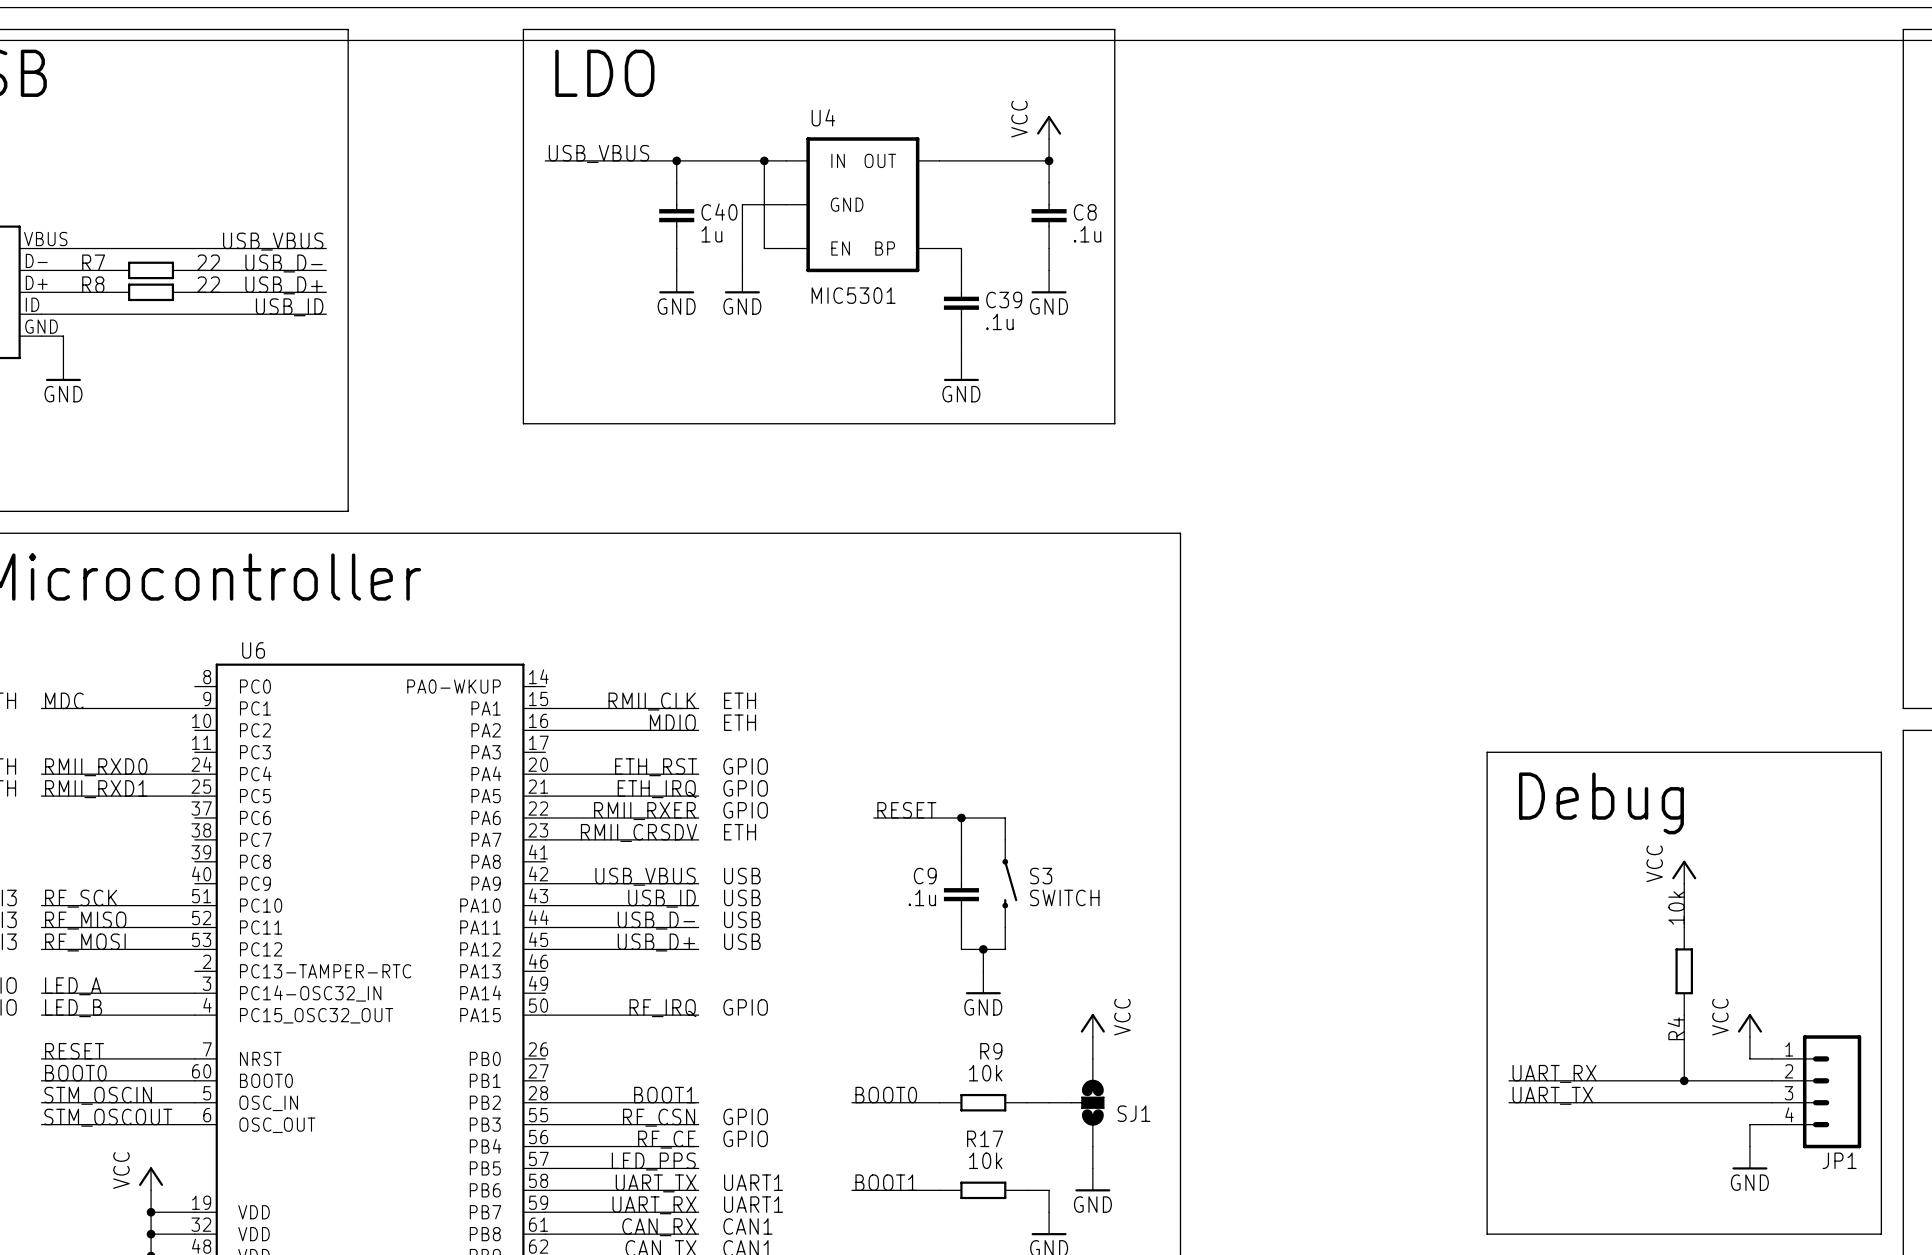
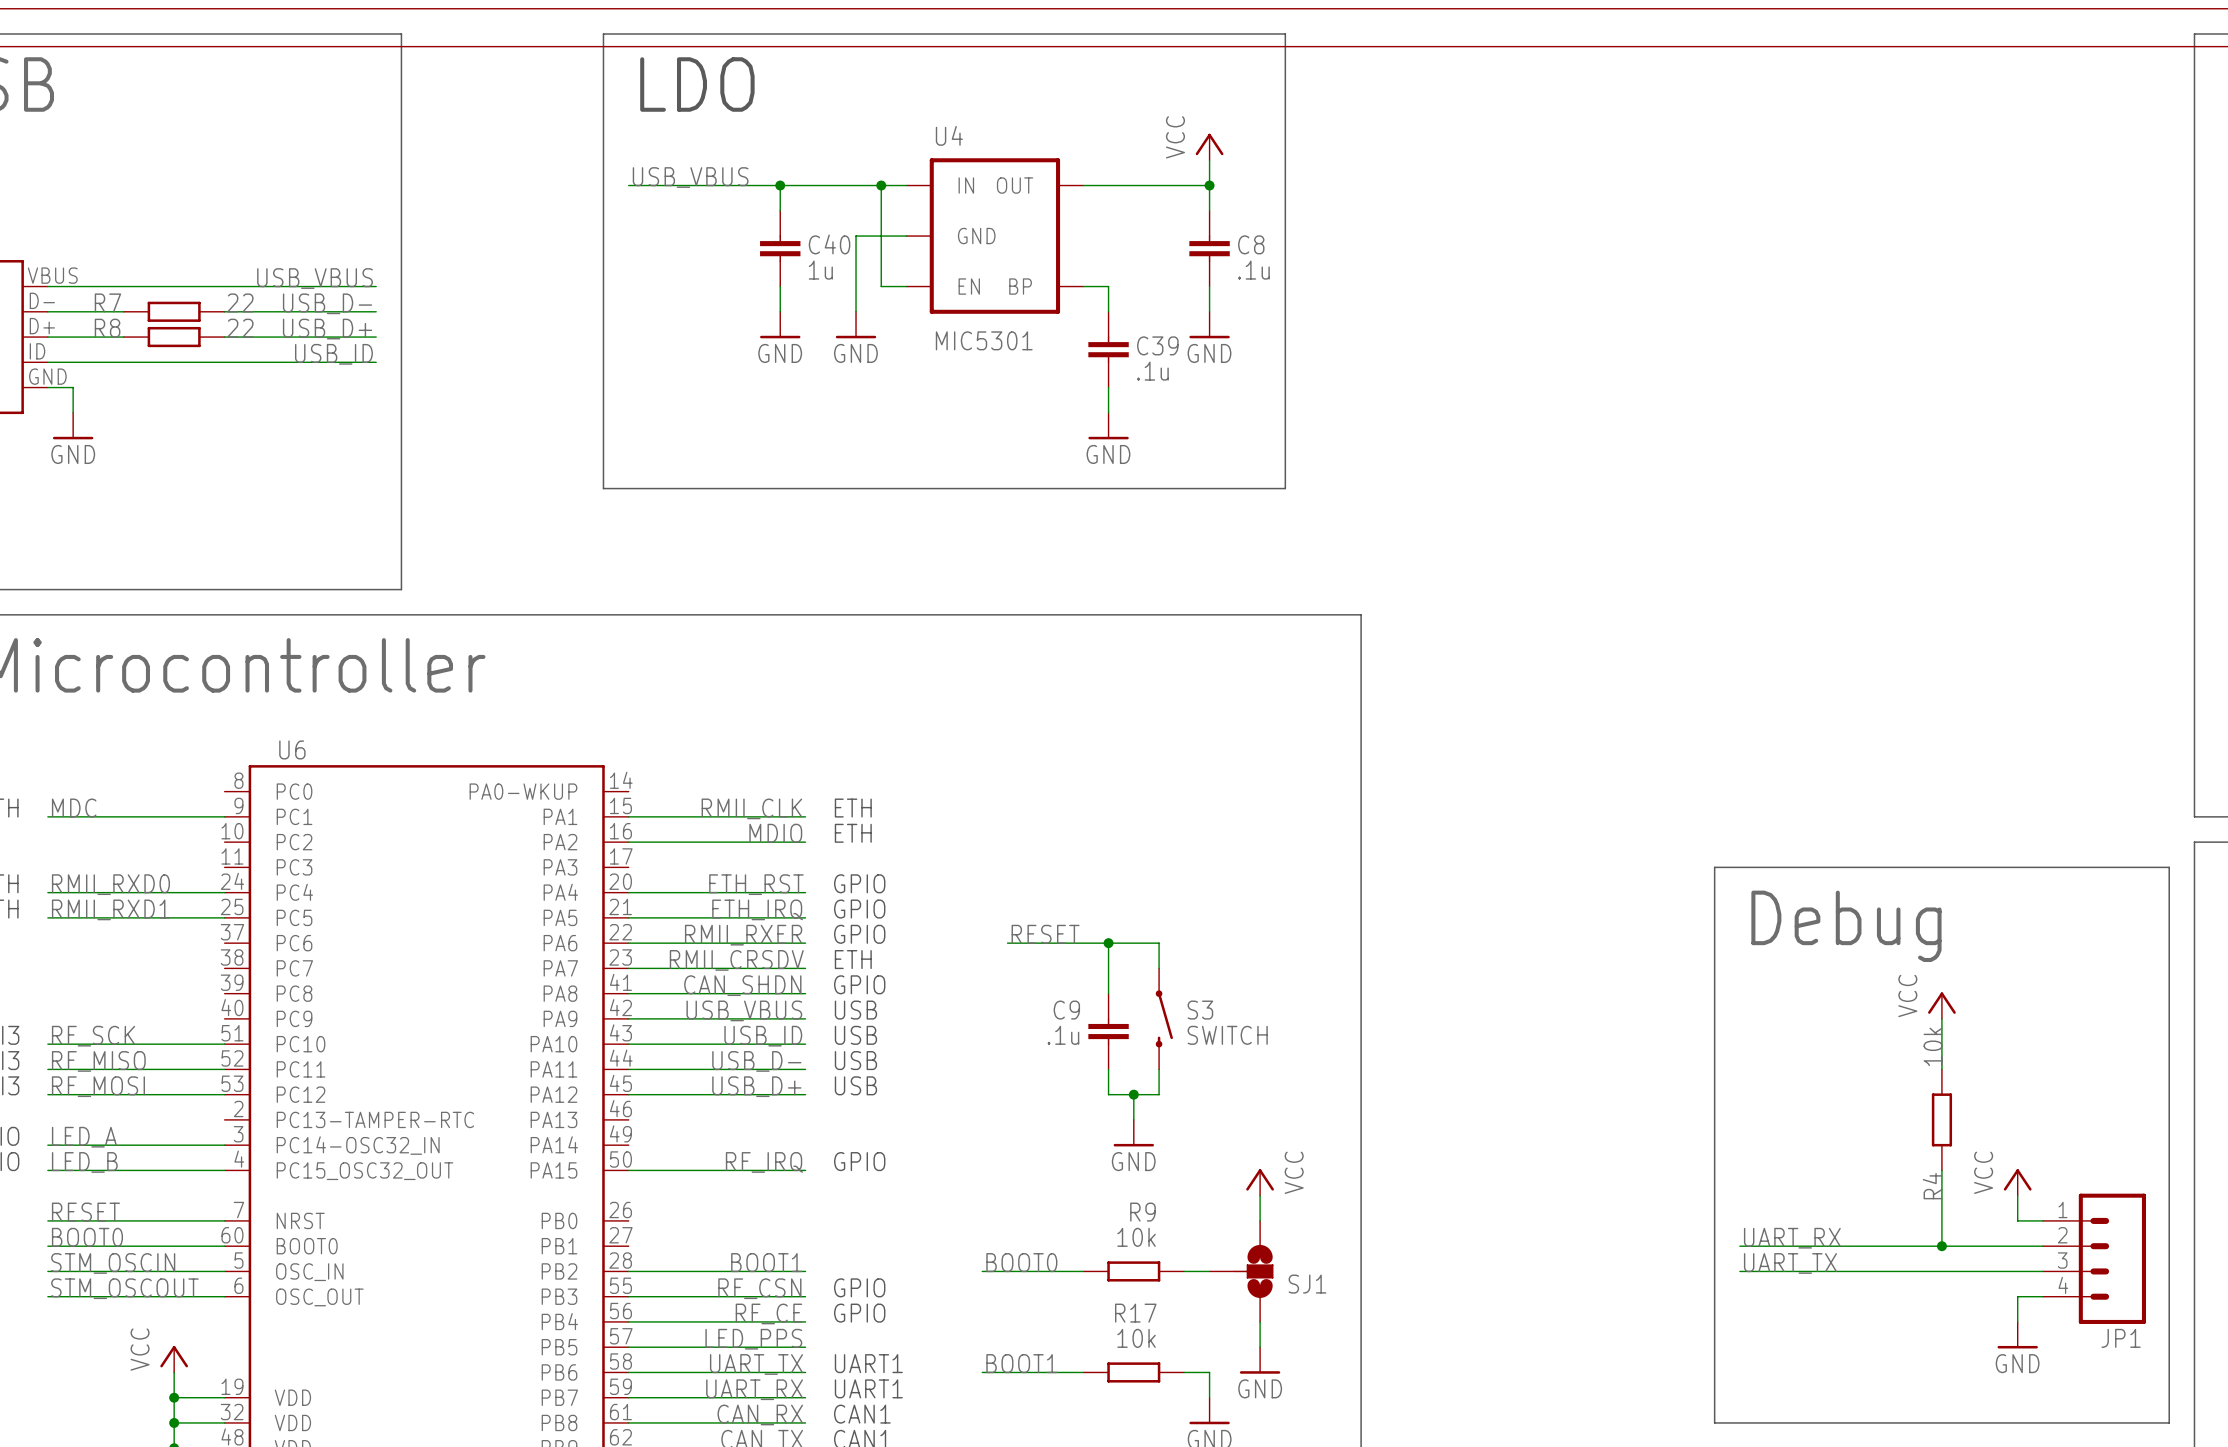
label: none -> CAN_SHDN (742, 985)
text: none -> GPIO (859, 984)
wire: none -> (628, 993) (805, 993)

